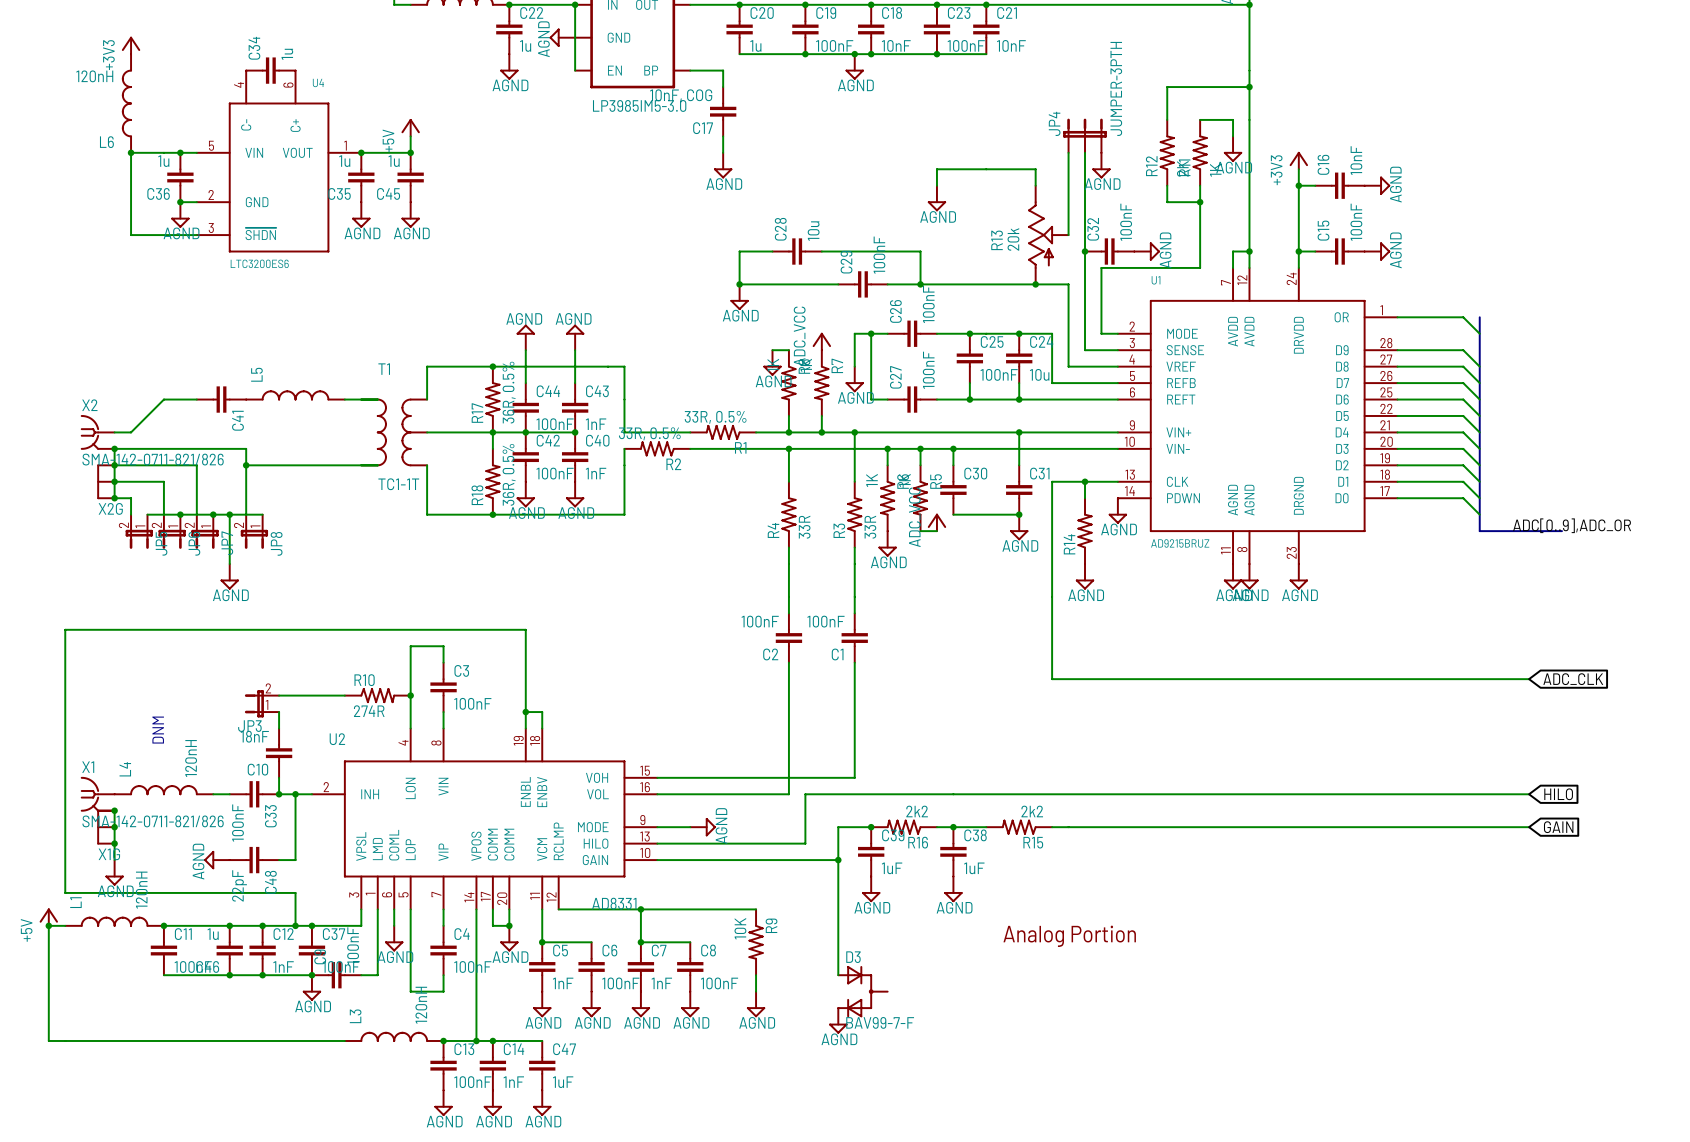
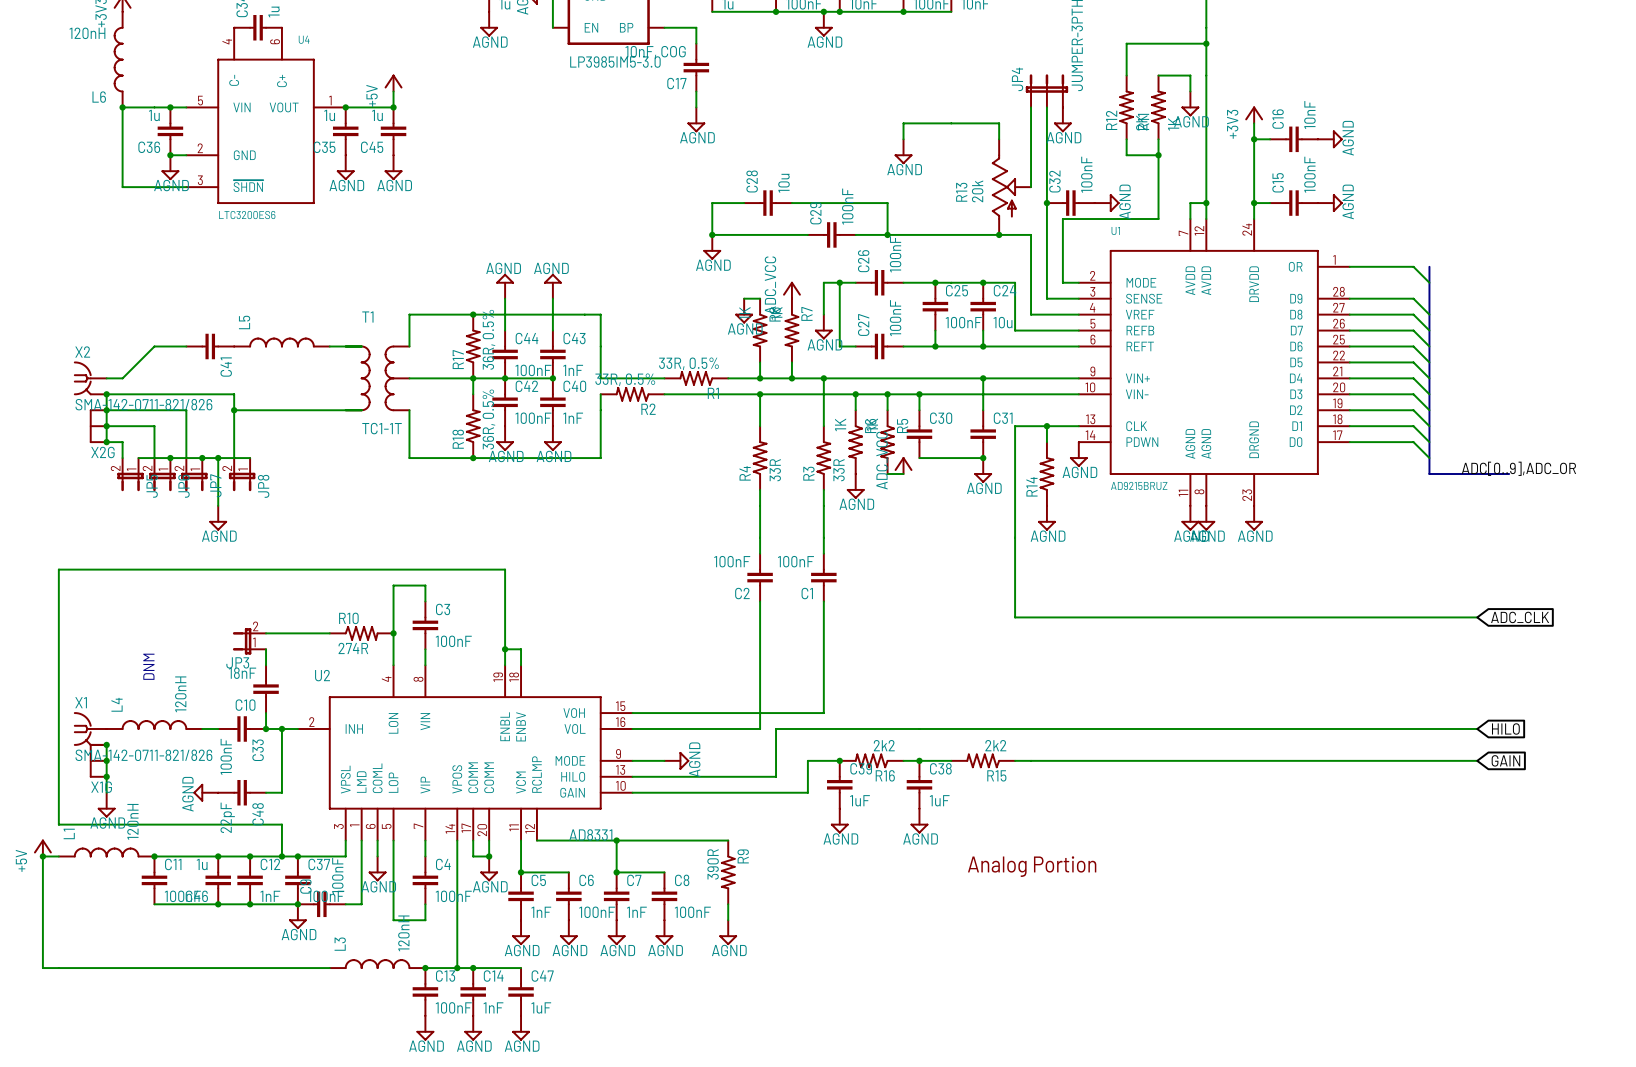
wire: (838, 860) (838, 975) -> none
junction: (838, 860) -> none
R9 value: 10K (740, 928) -> 390R (713, 864)
D3: BAV99-7-F (862, 991) -> none
power symbol: AGND (838, 1020) -> none

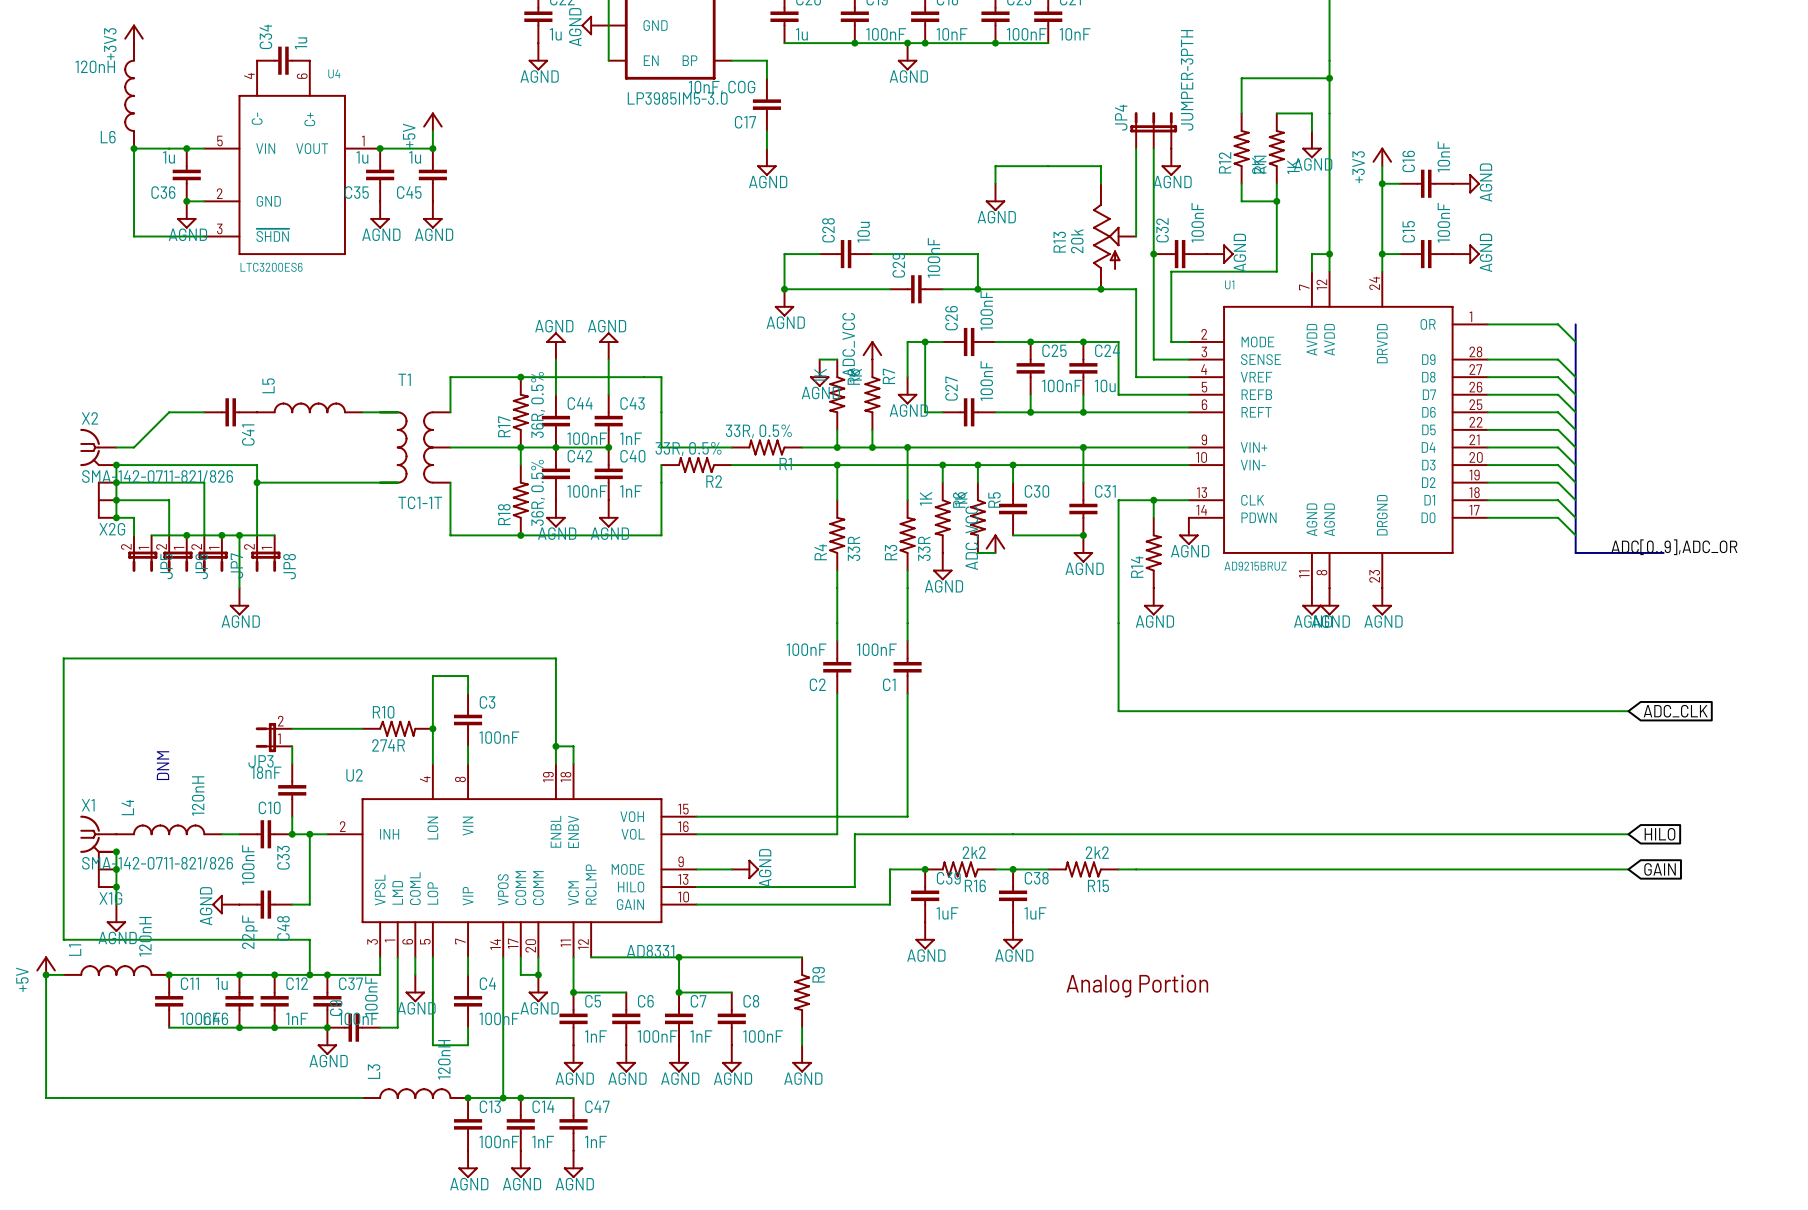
R9 value: 390R (713, 864) -> none
C47 value: 1uF (541, 1007) -> 1nF (595, 1141)

